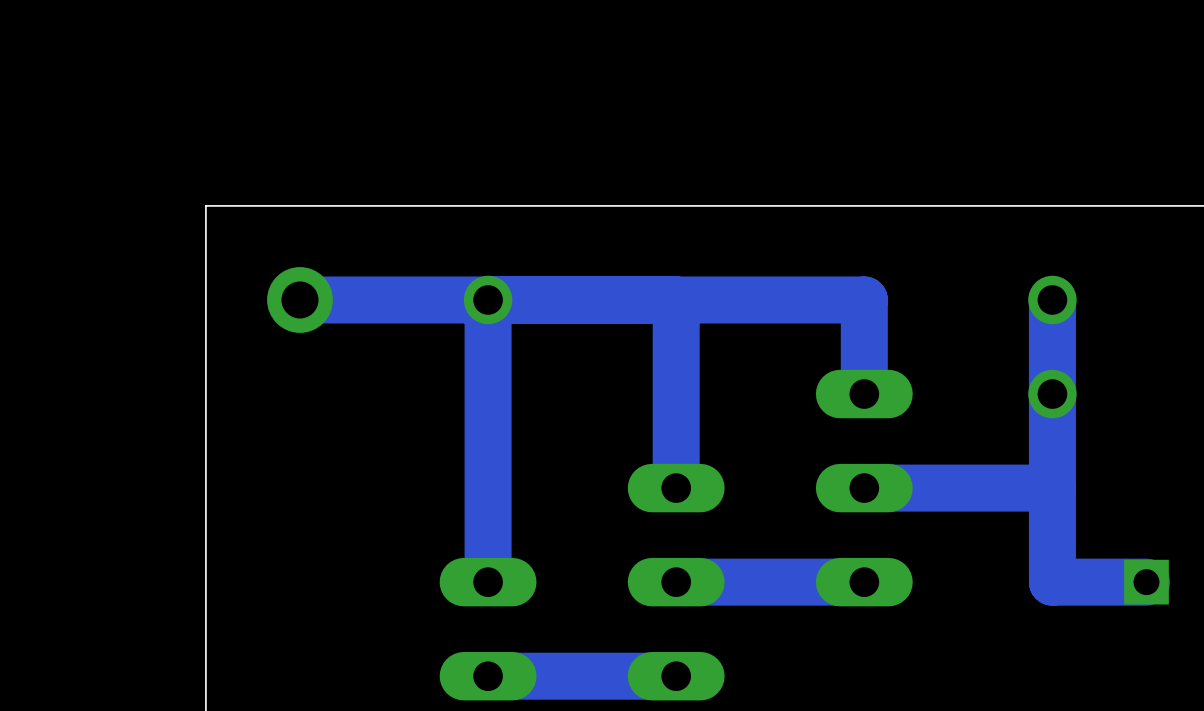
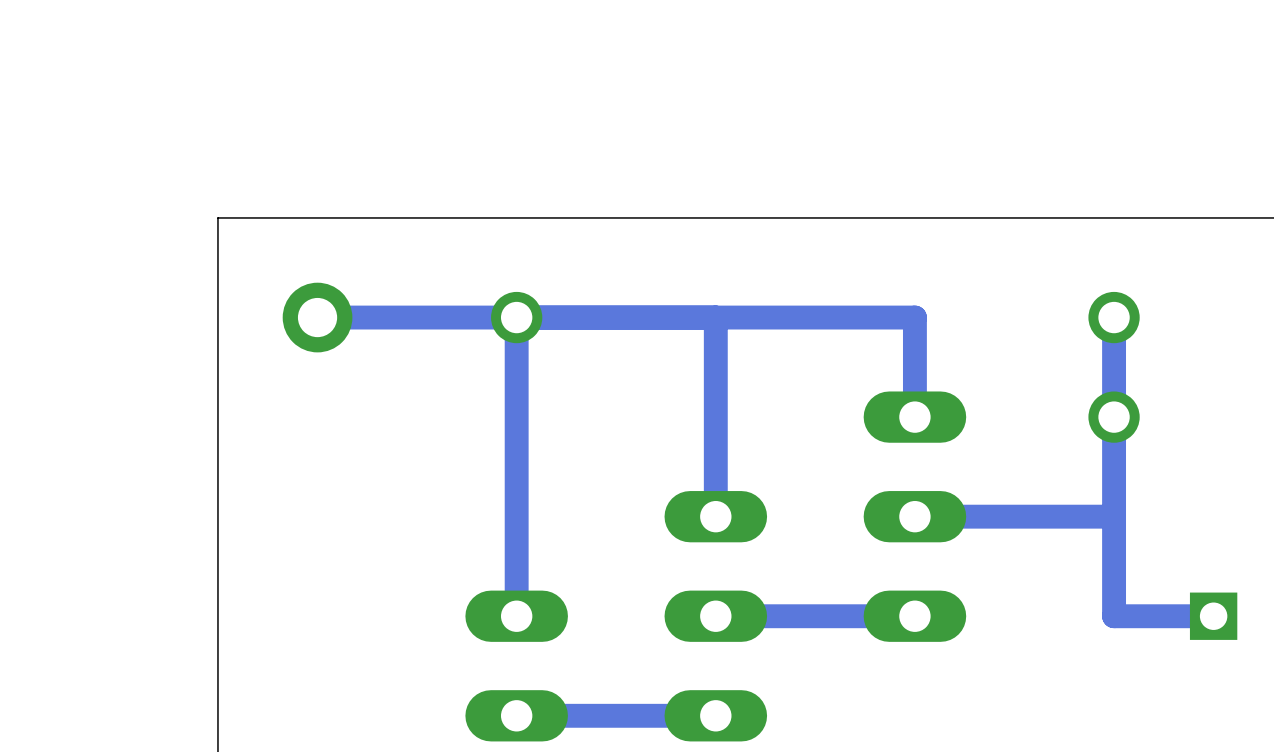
bottom track width: thick (299, 299) (864, 299) (864, 394) -> thin (317, 317) (914, 317) (914, 417)
bottom track width: thick (488, 299) (488, 582) -> thin (516, 317) (516, 616)
bottom track width: thick (676, 299) (676, 488) -> thin (715, 317) (715, 516)
bottom track width: thick (1052, 299) (1052, 582) (1146, 582) -> thin (1114, 317) (1114, 616) (1213, 616)
bottom track width: thick (1052, 488) (864, 488) -> thin (1114, 516) (914, 516)
bottom track width: thick (864, 582) (676, 582) -> thin (914, 616) (715, 616)
bottom track width: thick (676, 676) (488, 676) -> thin (715, 715) (516, 715)

